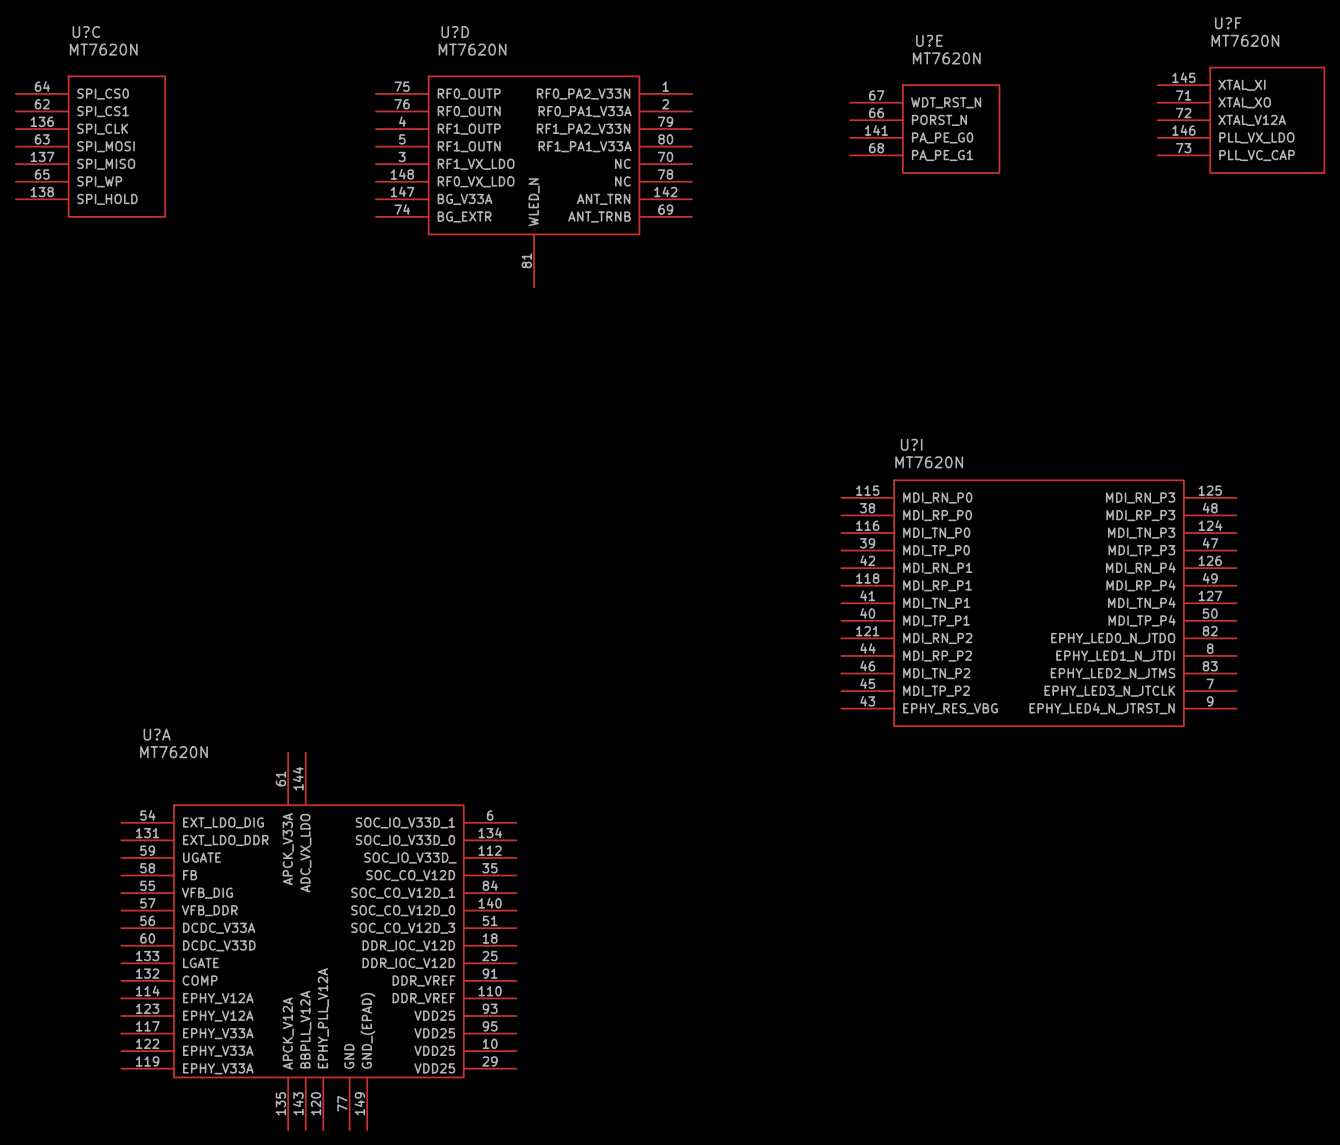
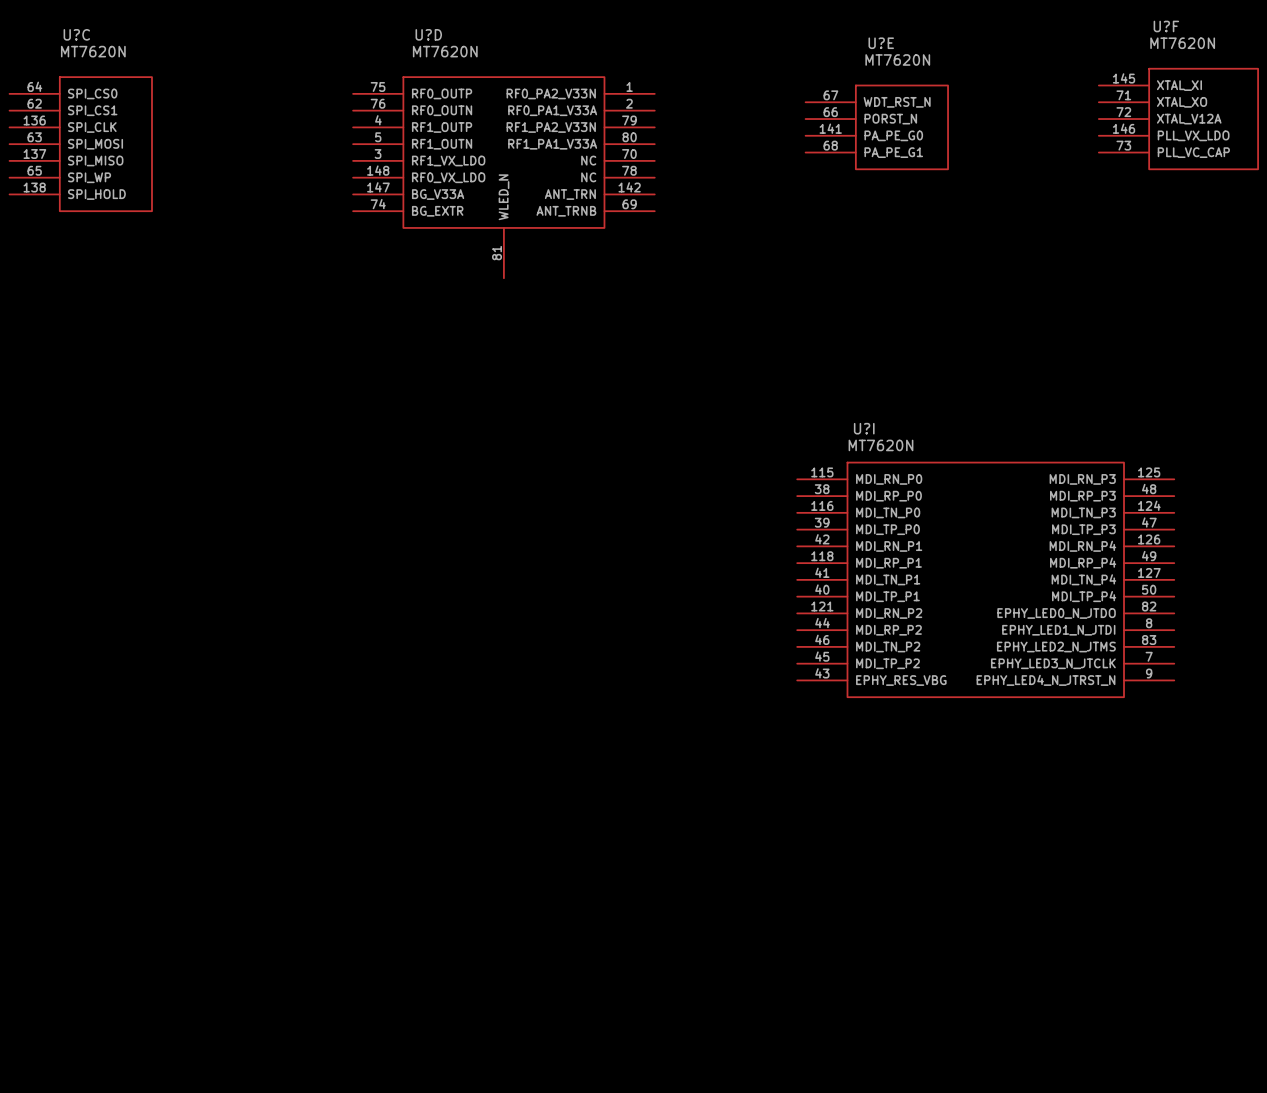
U?A: MT7620N (318, 941) -> none

